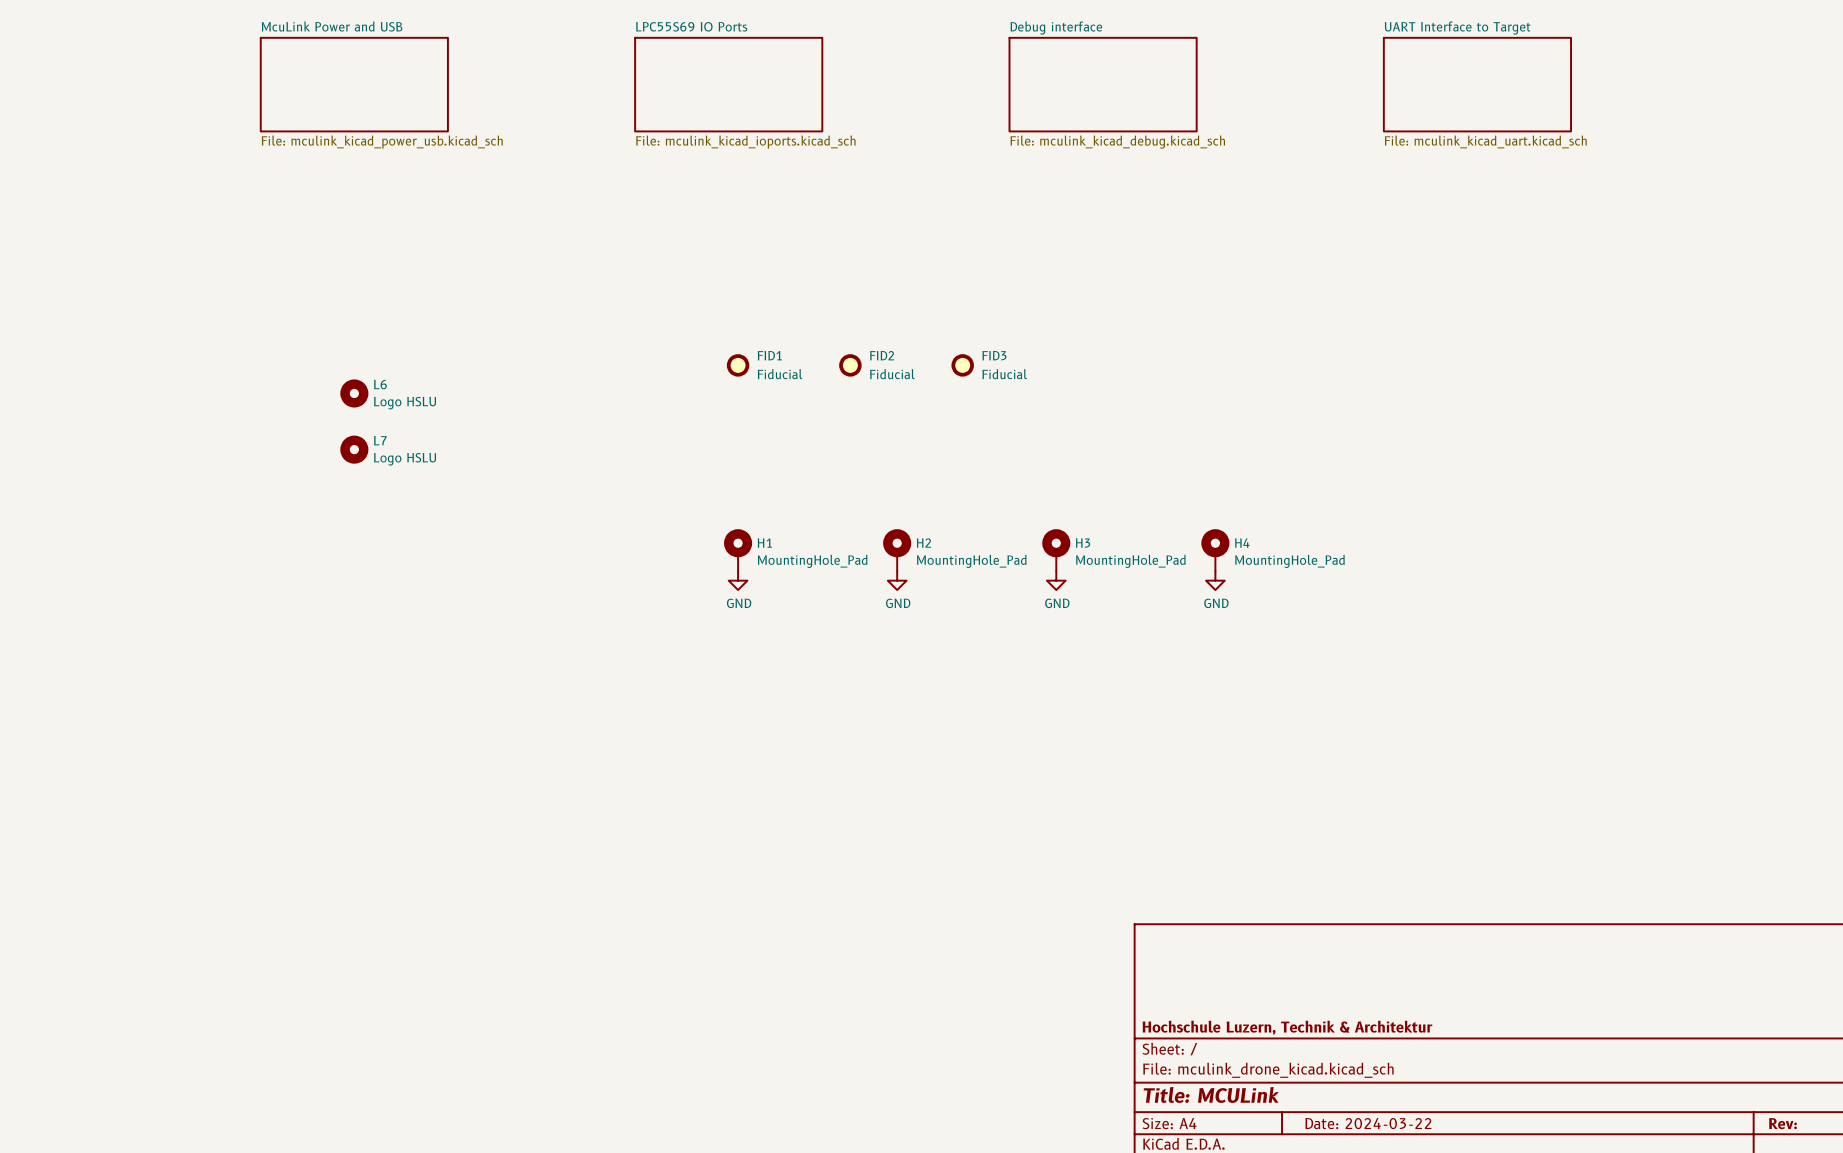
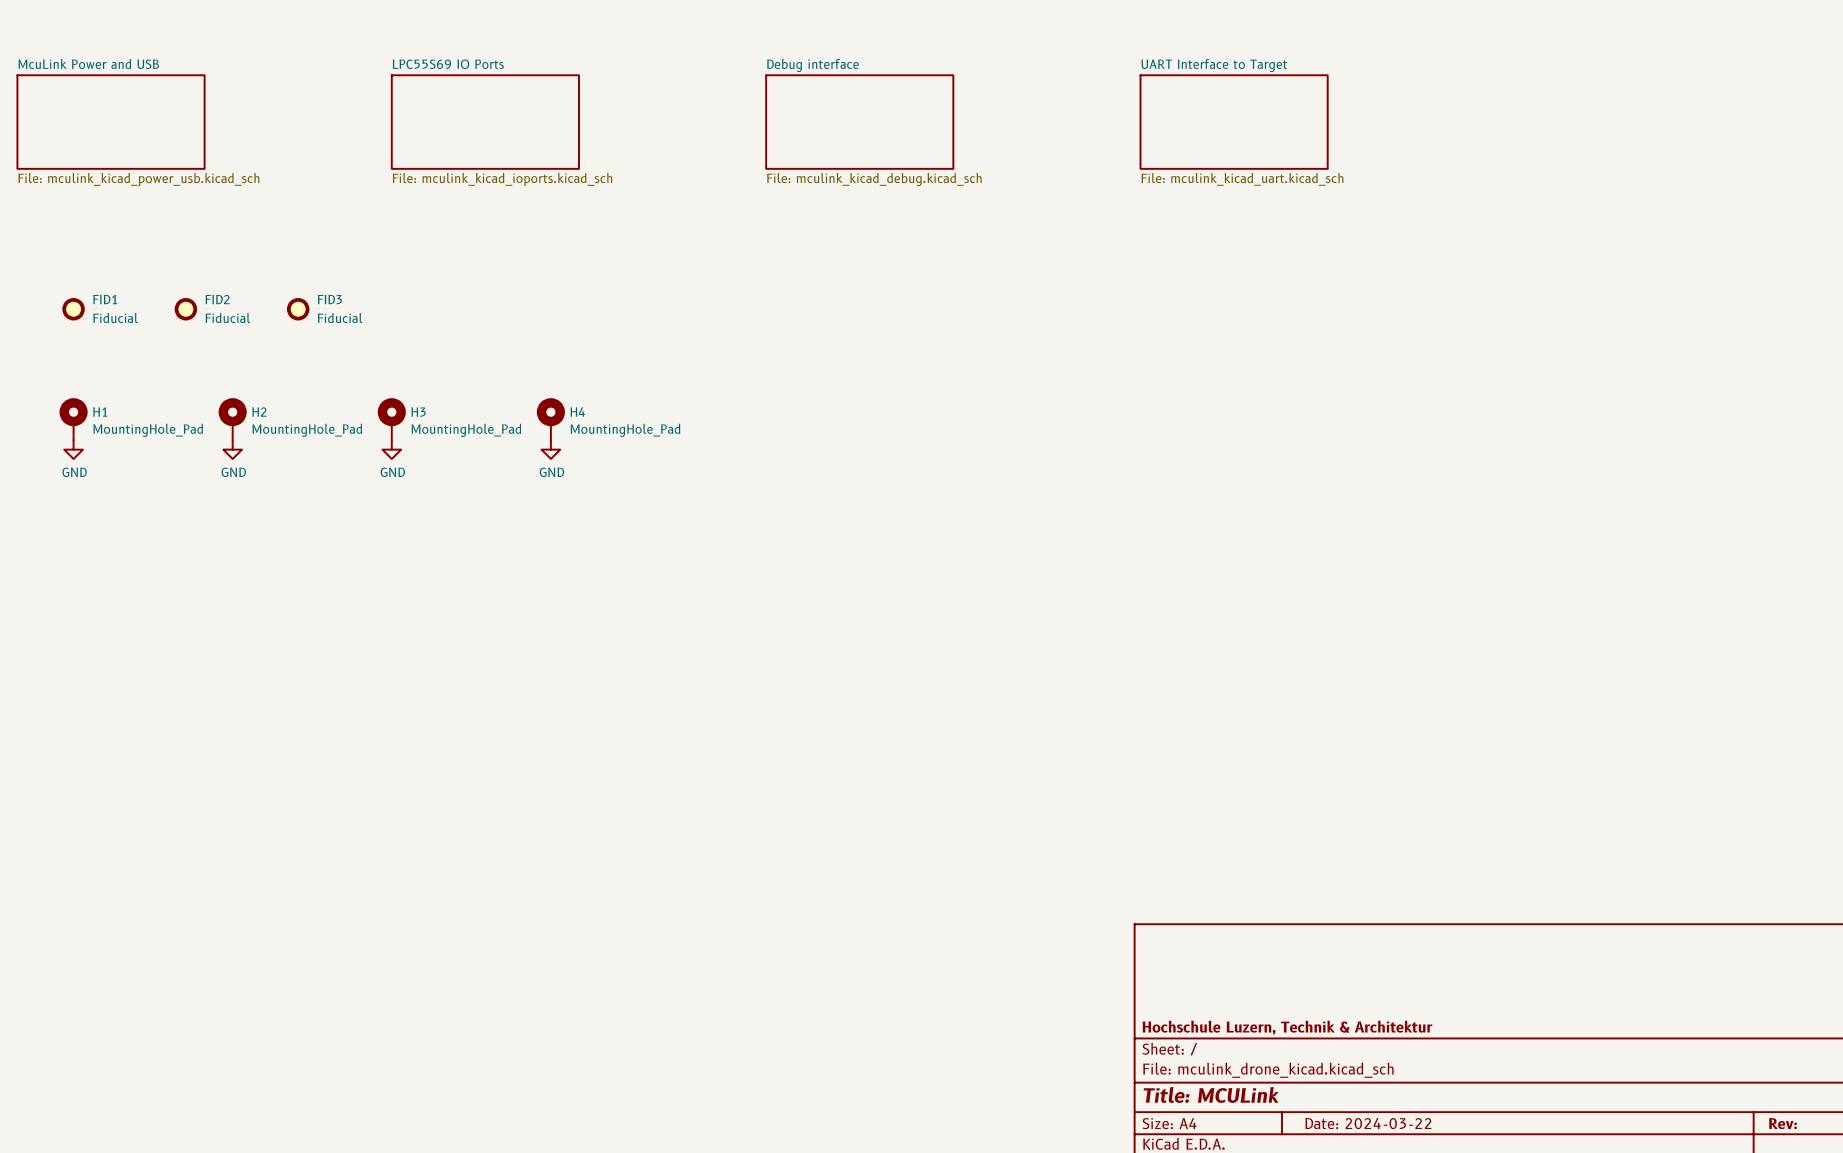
sheet McuLink Power and USB: File: mculink_kicad_power_usb.kicad_sch (354, 84) -> none
sheet LPC55S69 IO Ports position: (728, 84) -> (485, 122)
sheet Debug interface: File: mculink_kicad_debug.kicad_sch (1103, 84) -> none
sheet UART Interface to Target: File: mculink_kicad_uart.kicad_sch (1477, 84) -> none
sheet McuLink Power and USB: none -> File: mculink_kicad_power_usb.kicad_sch (111, 122)
sheet Debug interface: none -> File: mculink_kicad_debug.kicad_sch (859, 122)
sheet UART Interface to Target: none -> File: mculink_kicad_uart.kicad_sch (1234, 122)
FID1 position: (738, 365) -> (73, 309)
FID2 position: (850, 365) -> (185, 309)
FID3 position: (962, 365) -> (298, 309)
L6: Logo HSLU (354, 393) -> none
power symbol: none -> GND (73, 449)
power symbol: none -> GND (232, 449)
L7: Logo HSLU (354, 449) -> none
power symbol: none -> GND (391, 449)
power symbol: none -> GND (550, 449)
H1 position: (738, 550) -> (73, 419)
H2 position: (897, 550) -> (232, 419)
H3 position: (1056, 550) -> (391, 419)
H4 position: (1215, 550) -> (550, 419)
power symbol: GND (738, 580) -> none
power symbol: GND (897, 580) -> none
power symbol: GND (1056, 580) -> none
power symbol: GND (1215, 580) -> none

